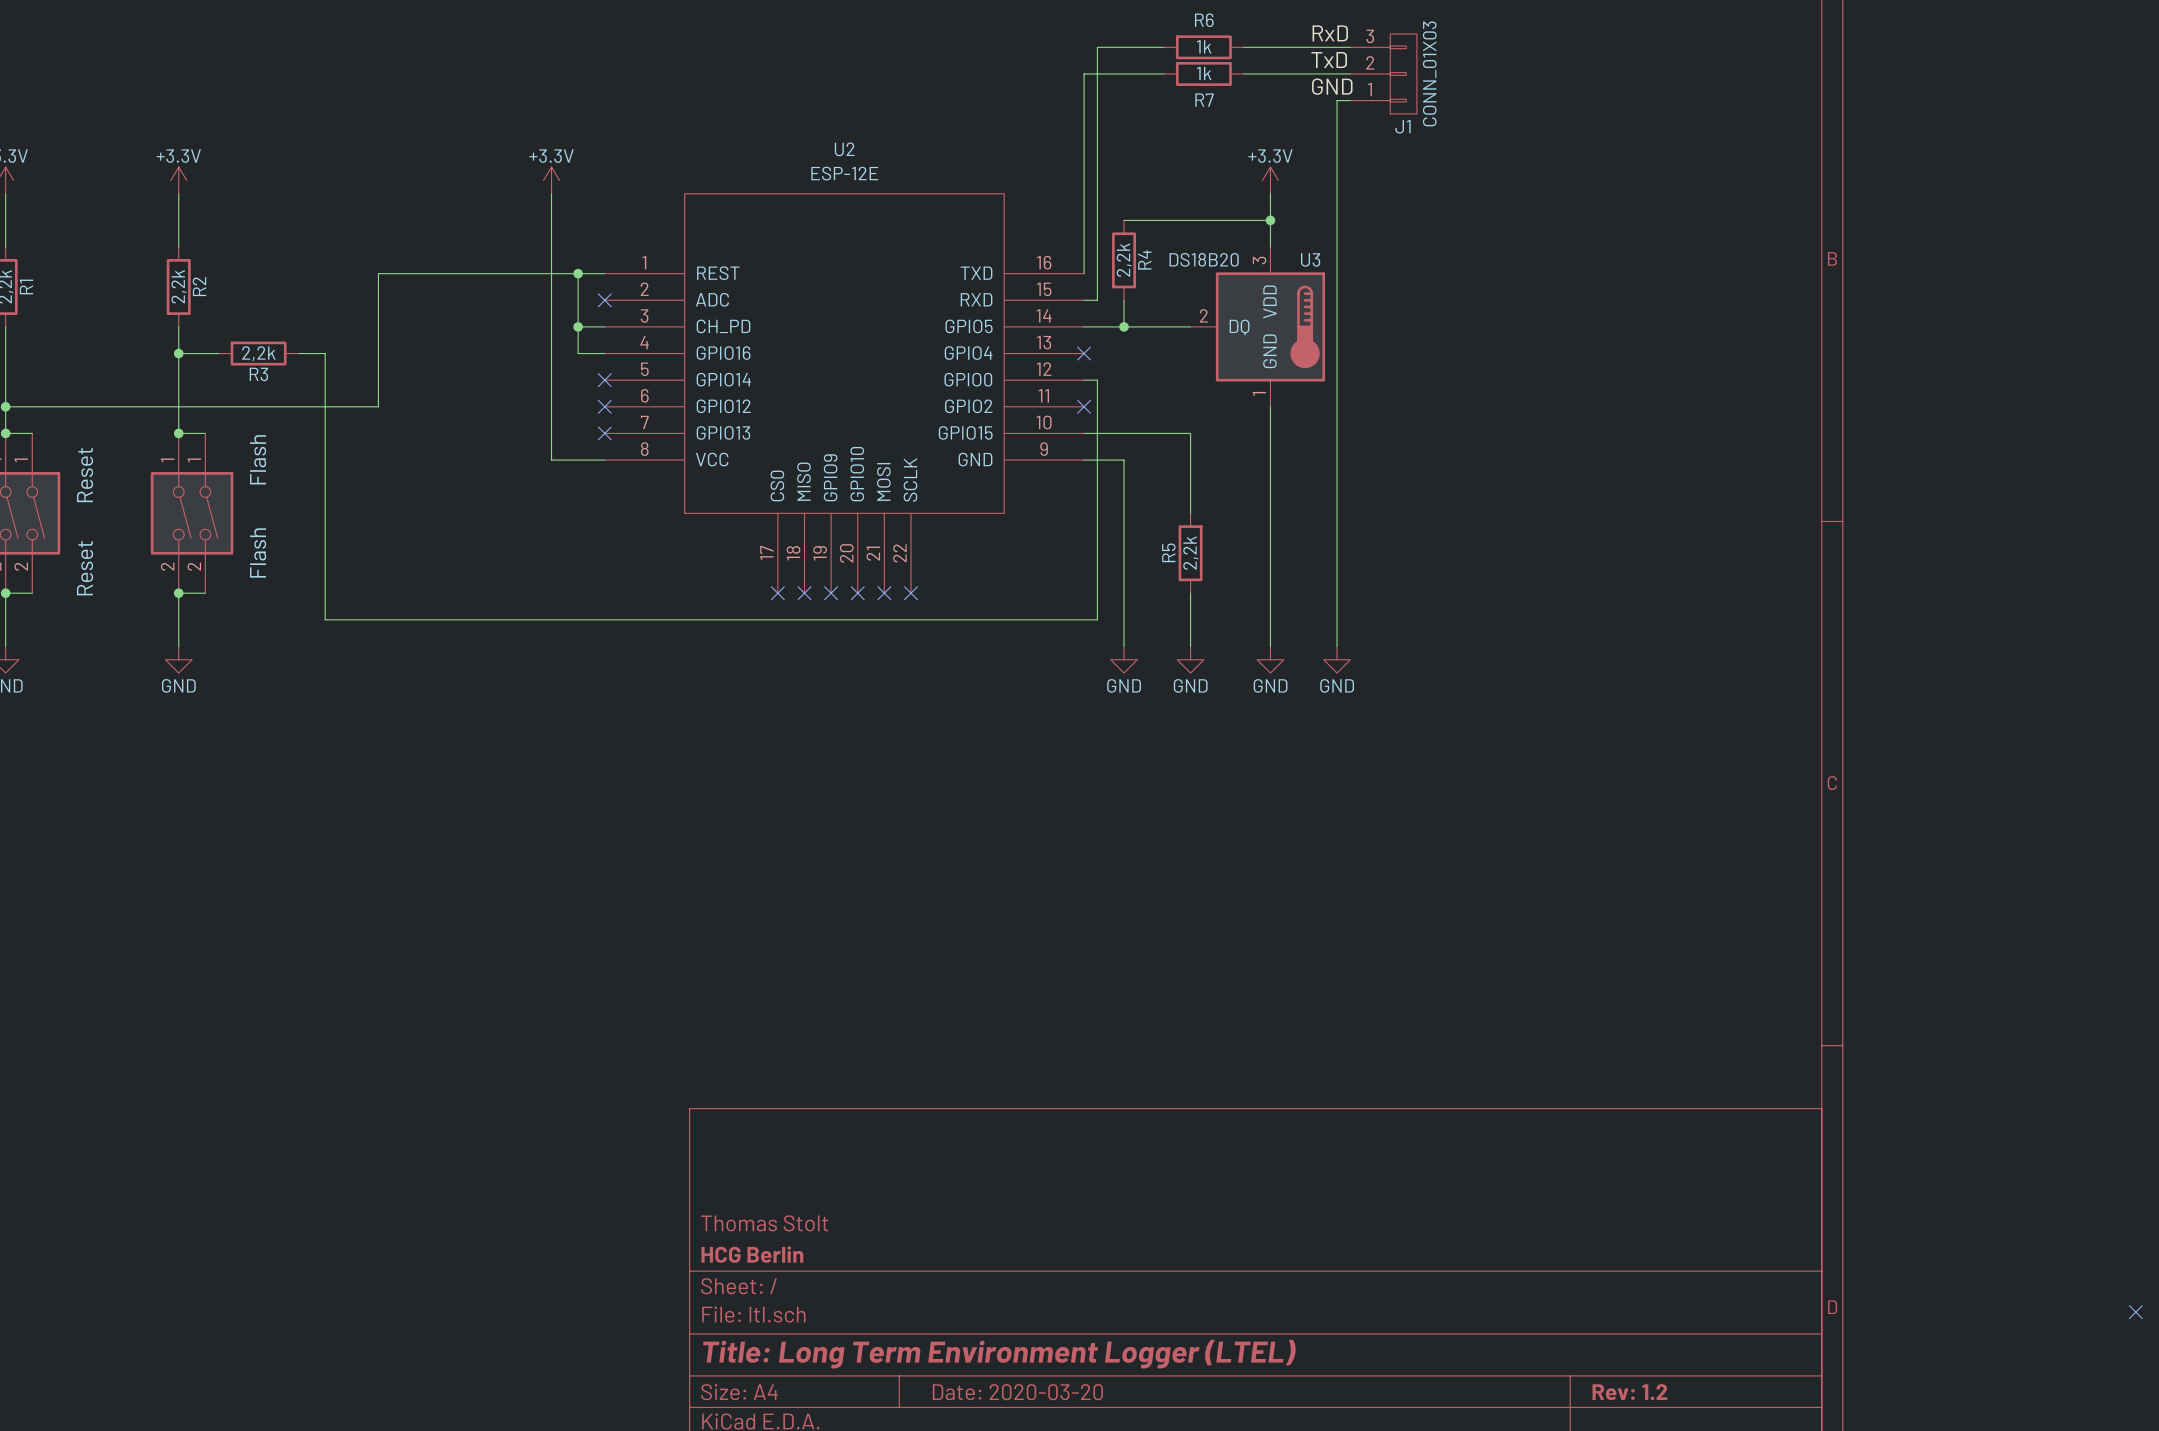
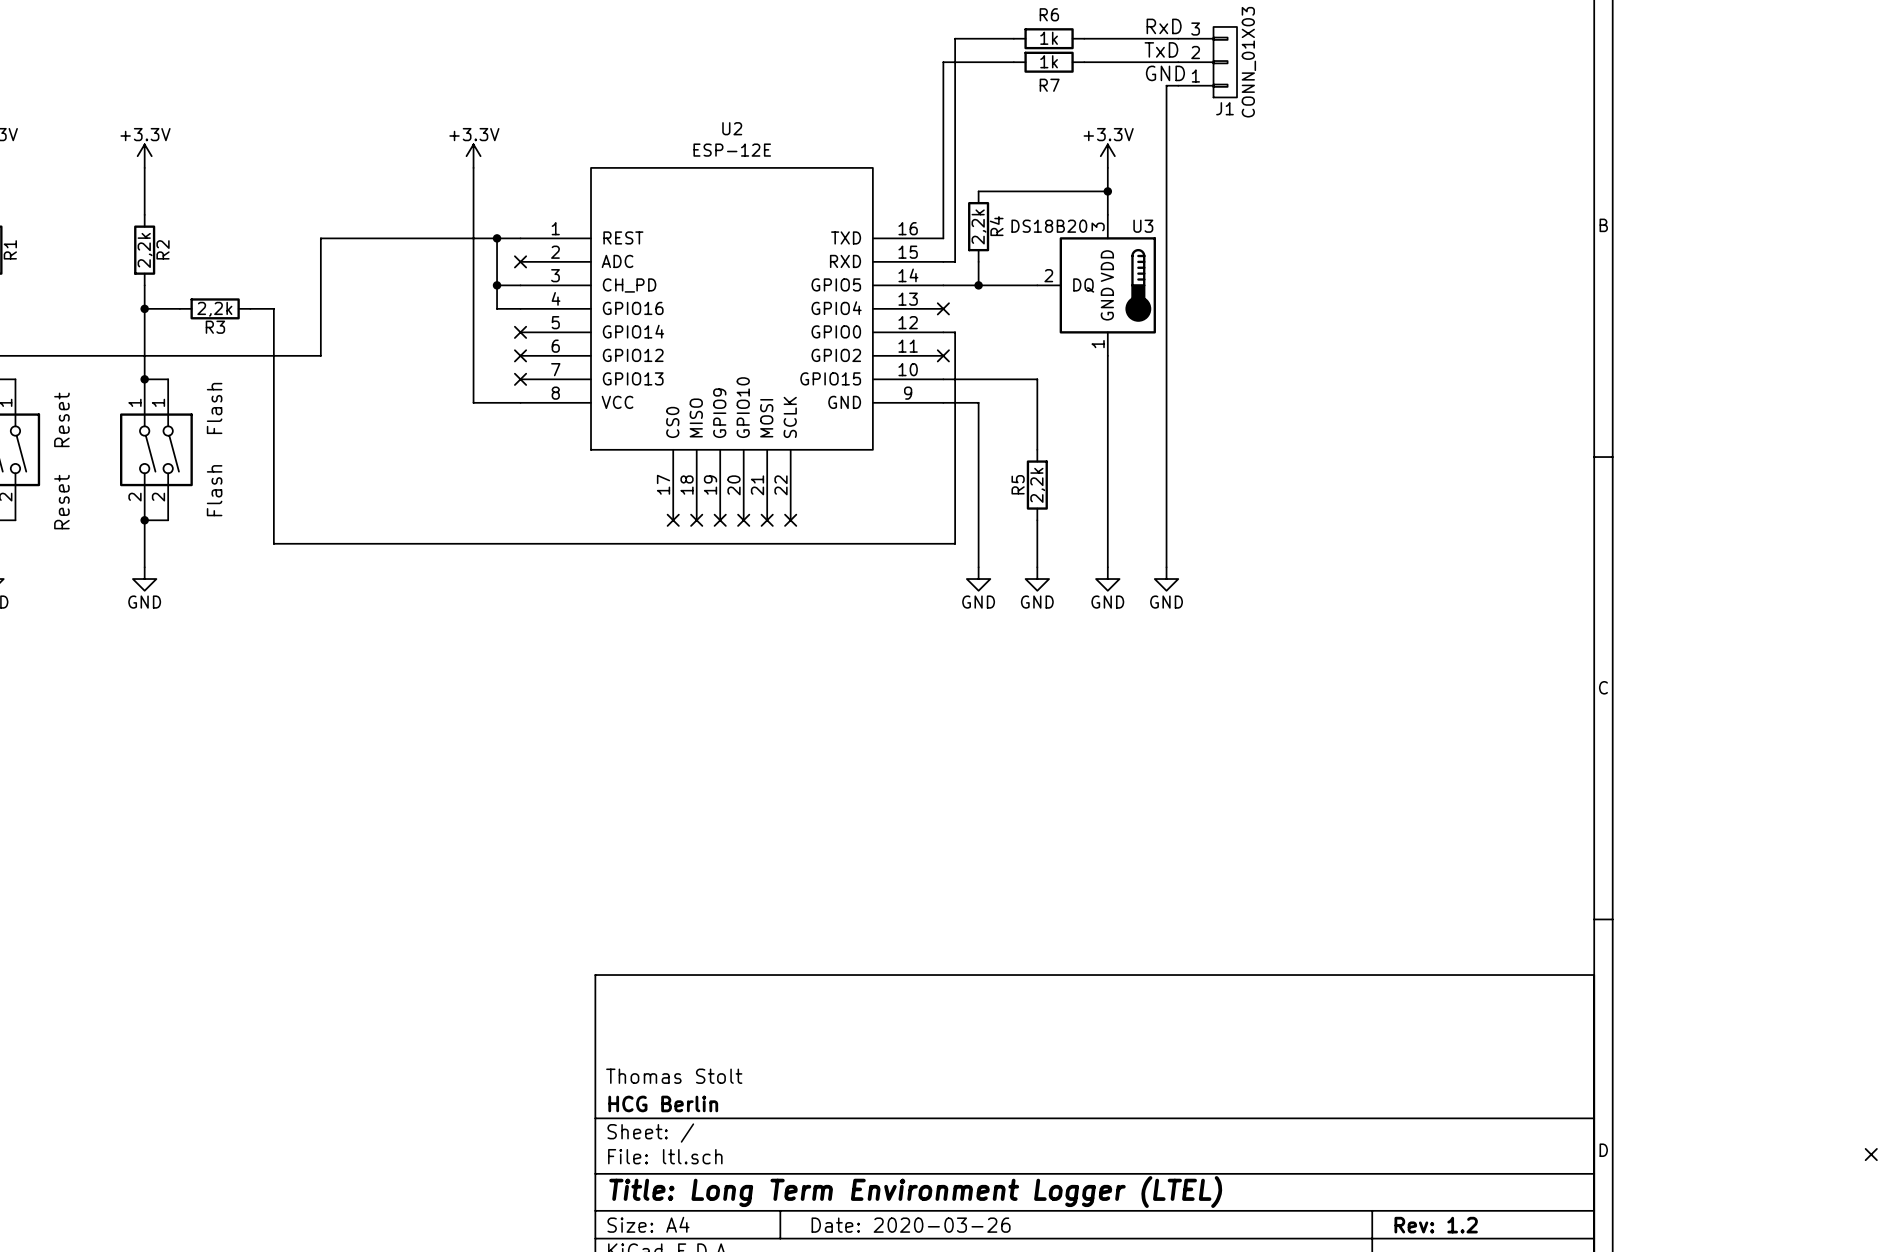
title block: Date: 2020-03-20 (1017, 1392) -> Date: 2020-03-26 (911, 1225)

